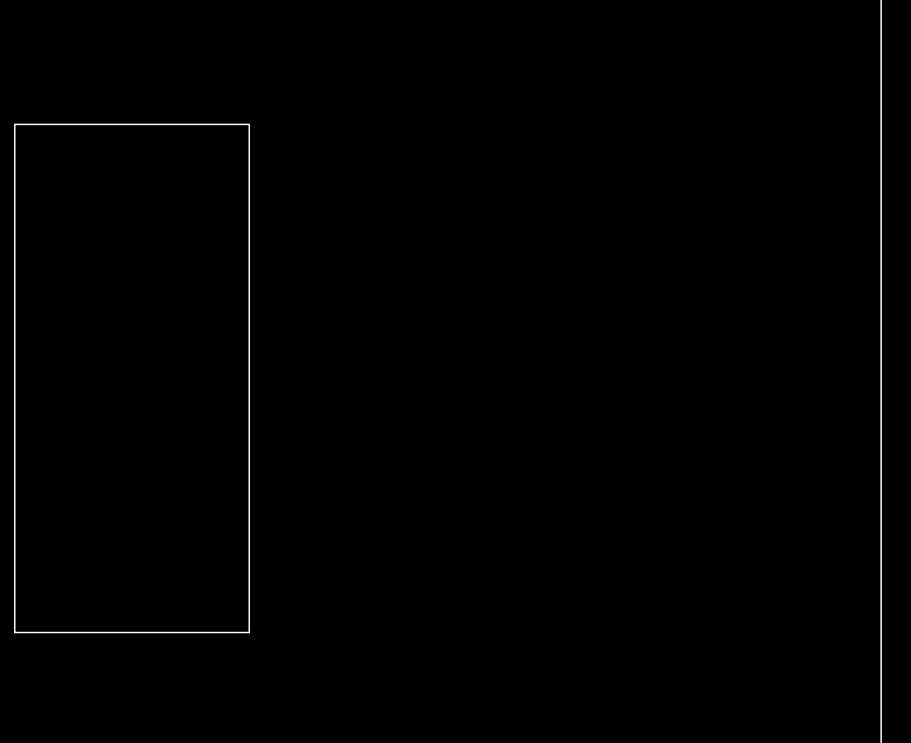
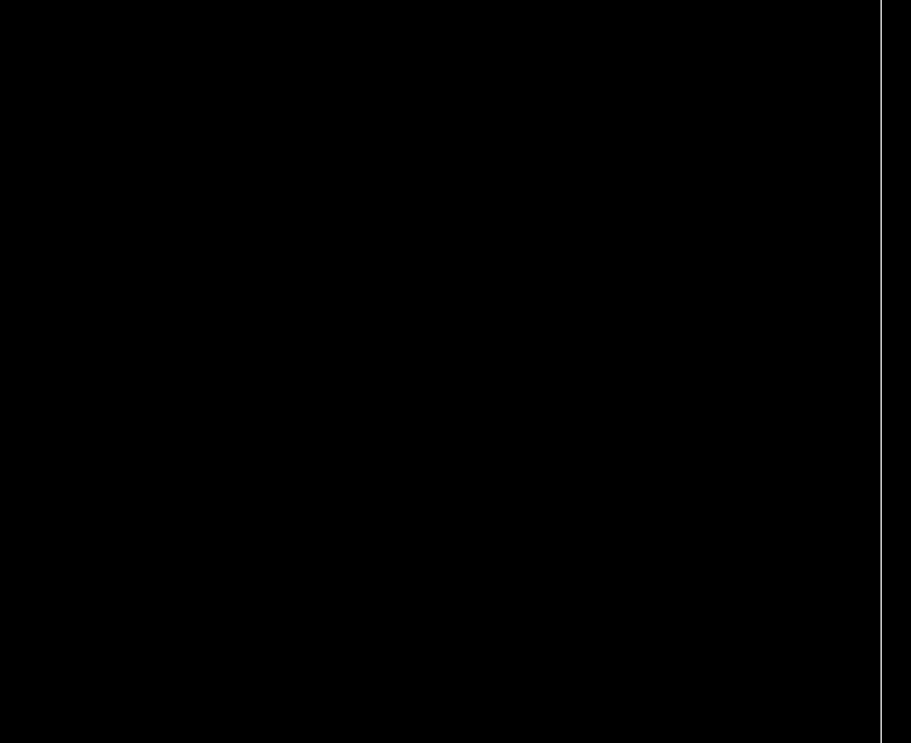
part: (132, 378) -> none

